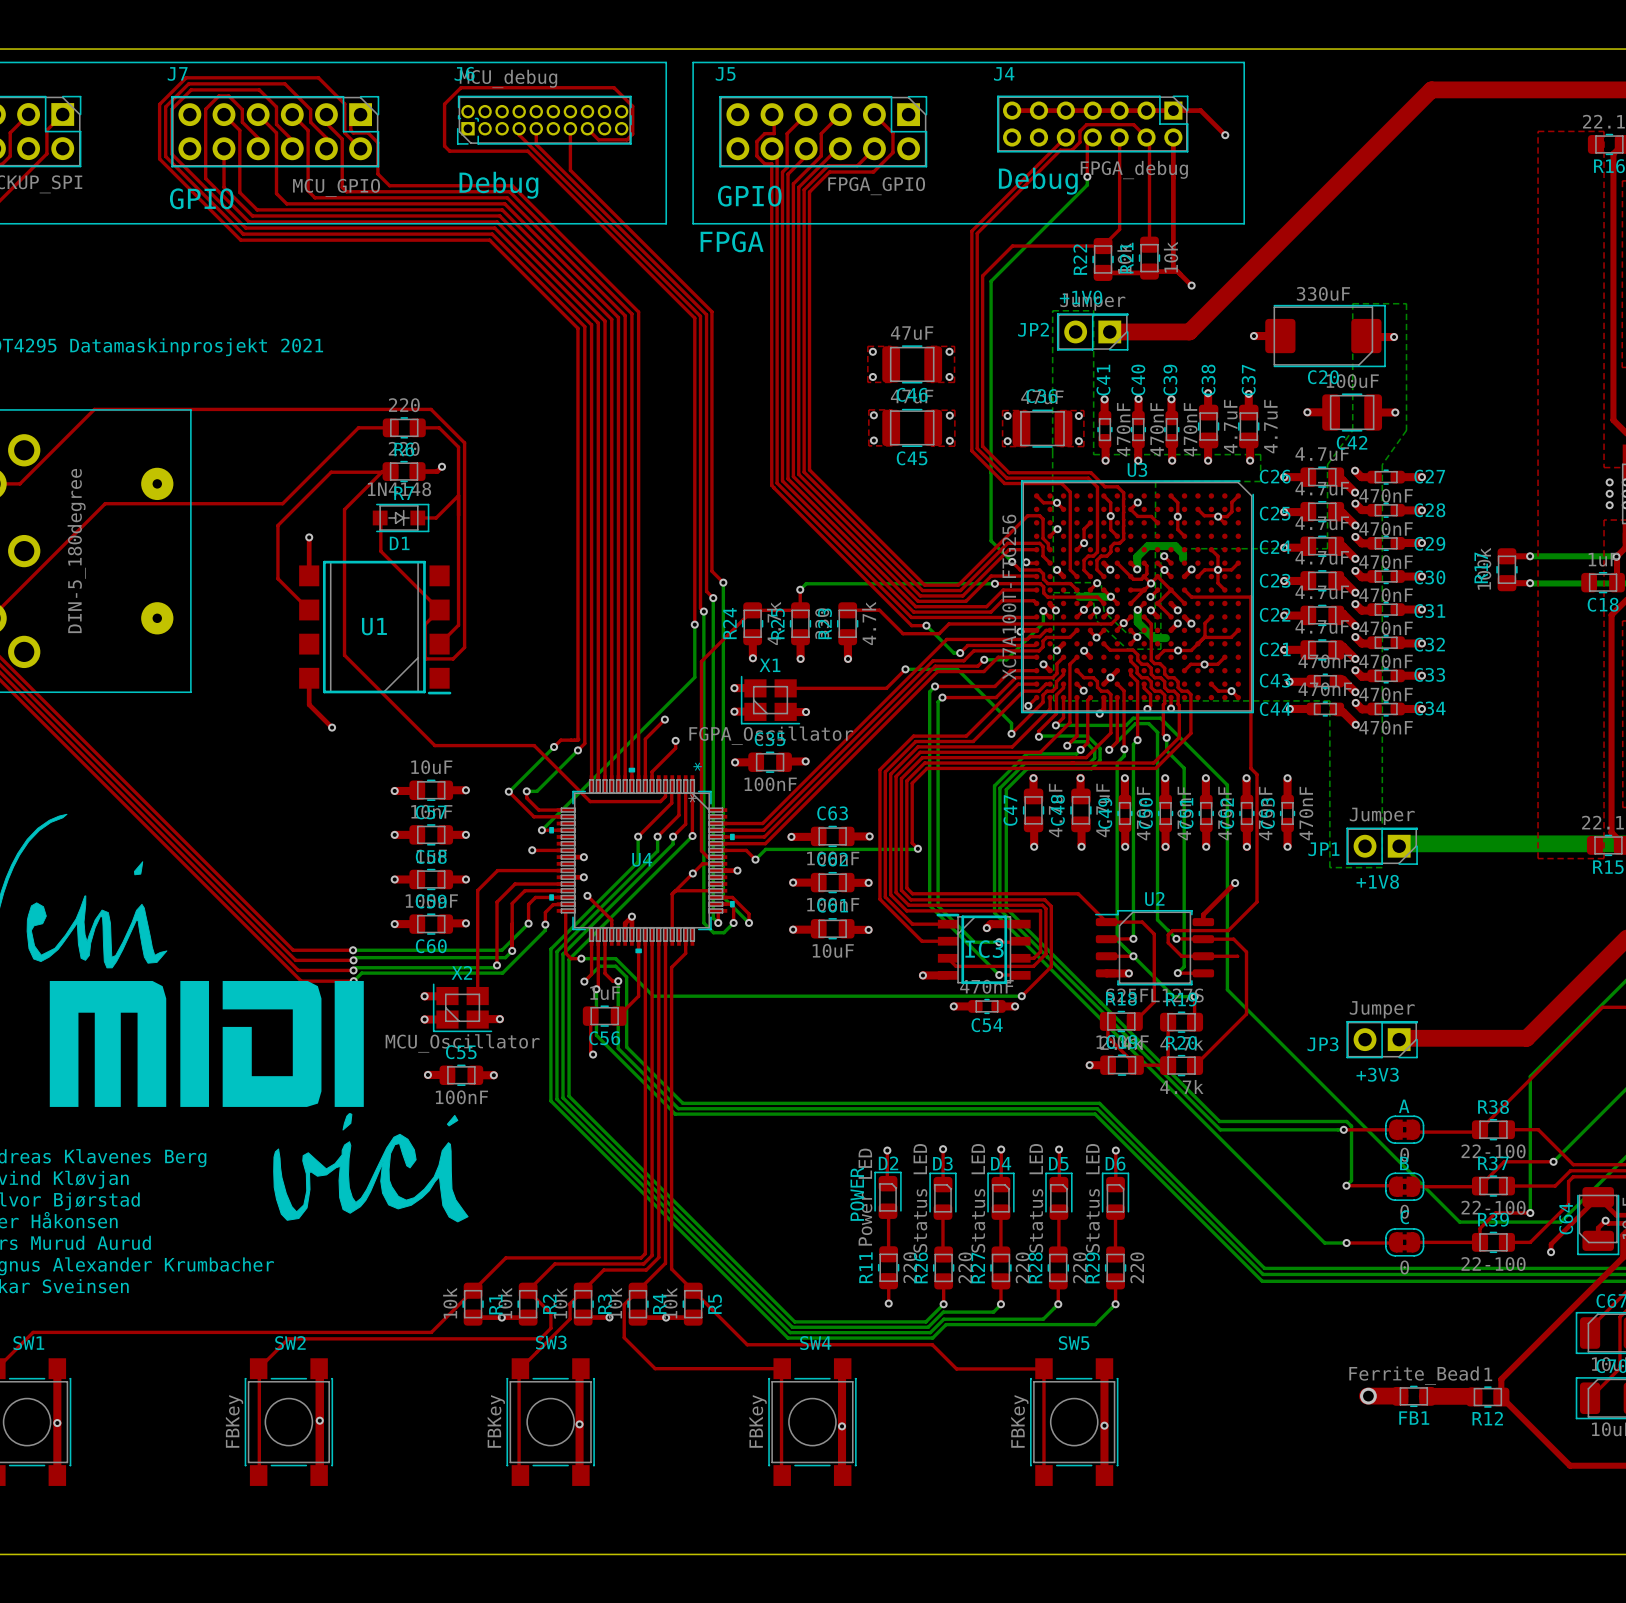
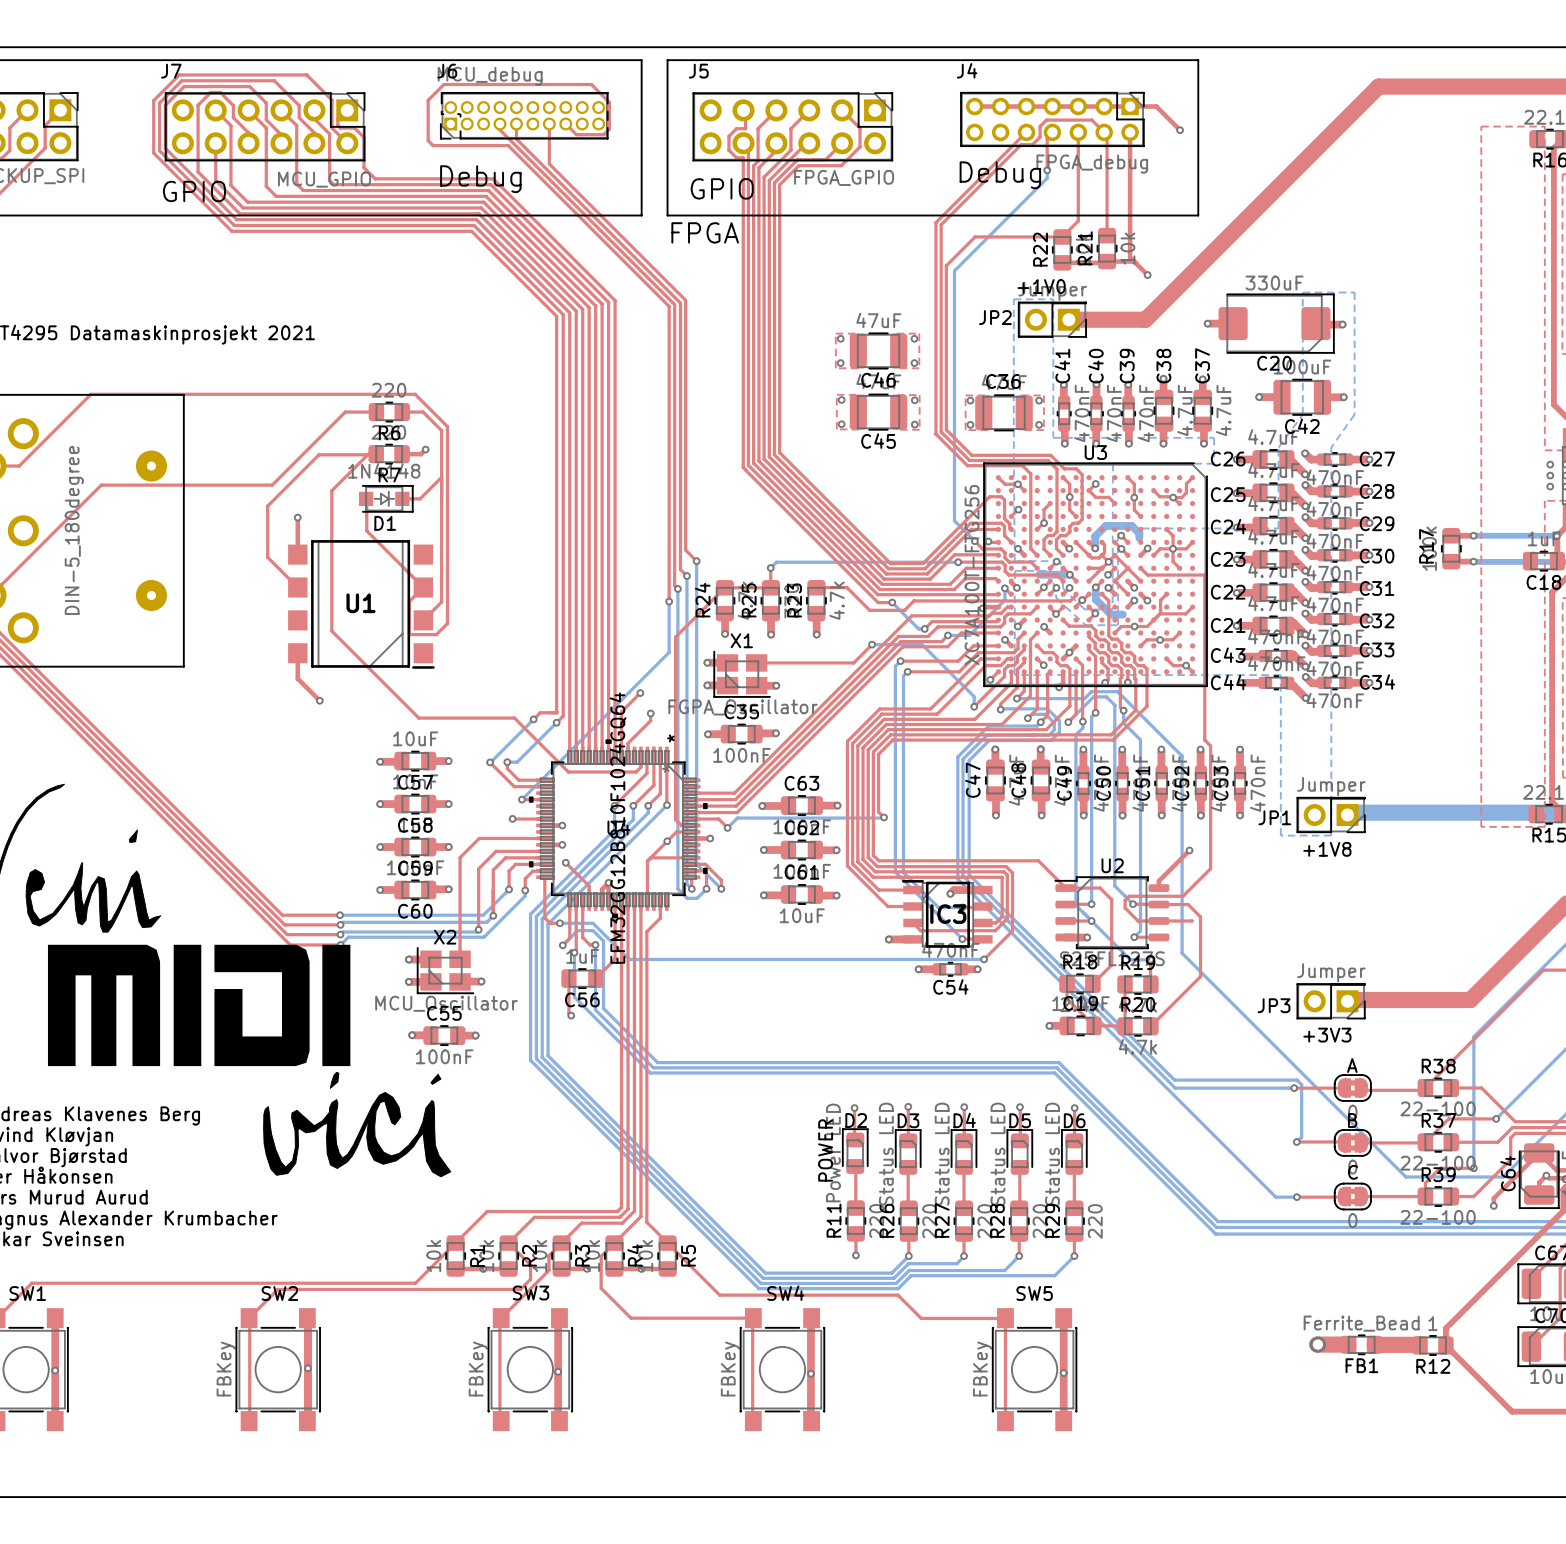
U4 value: none -> EFM32GG12B810F1024GQ64 (618, 828)

